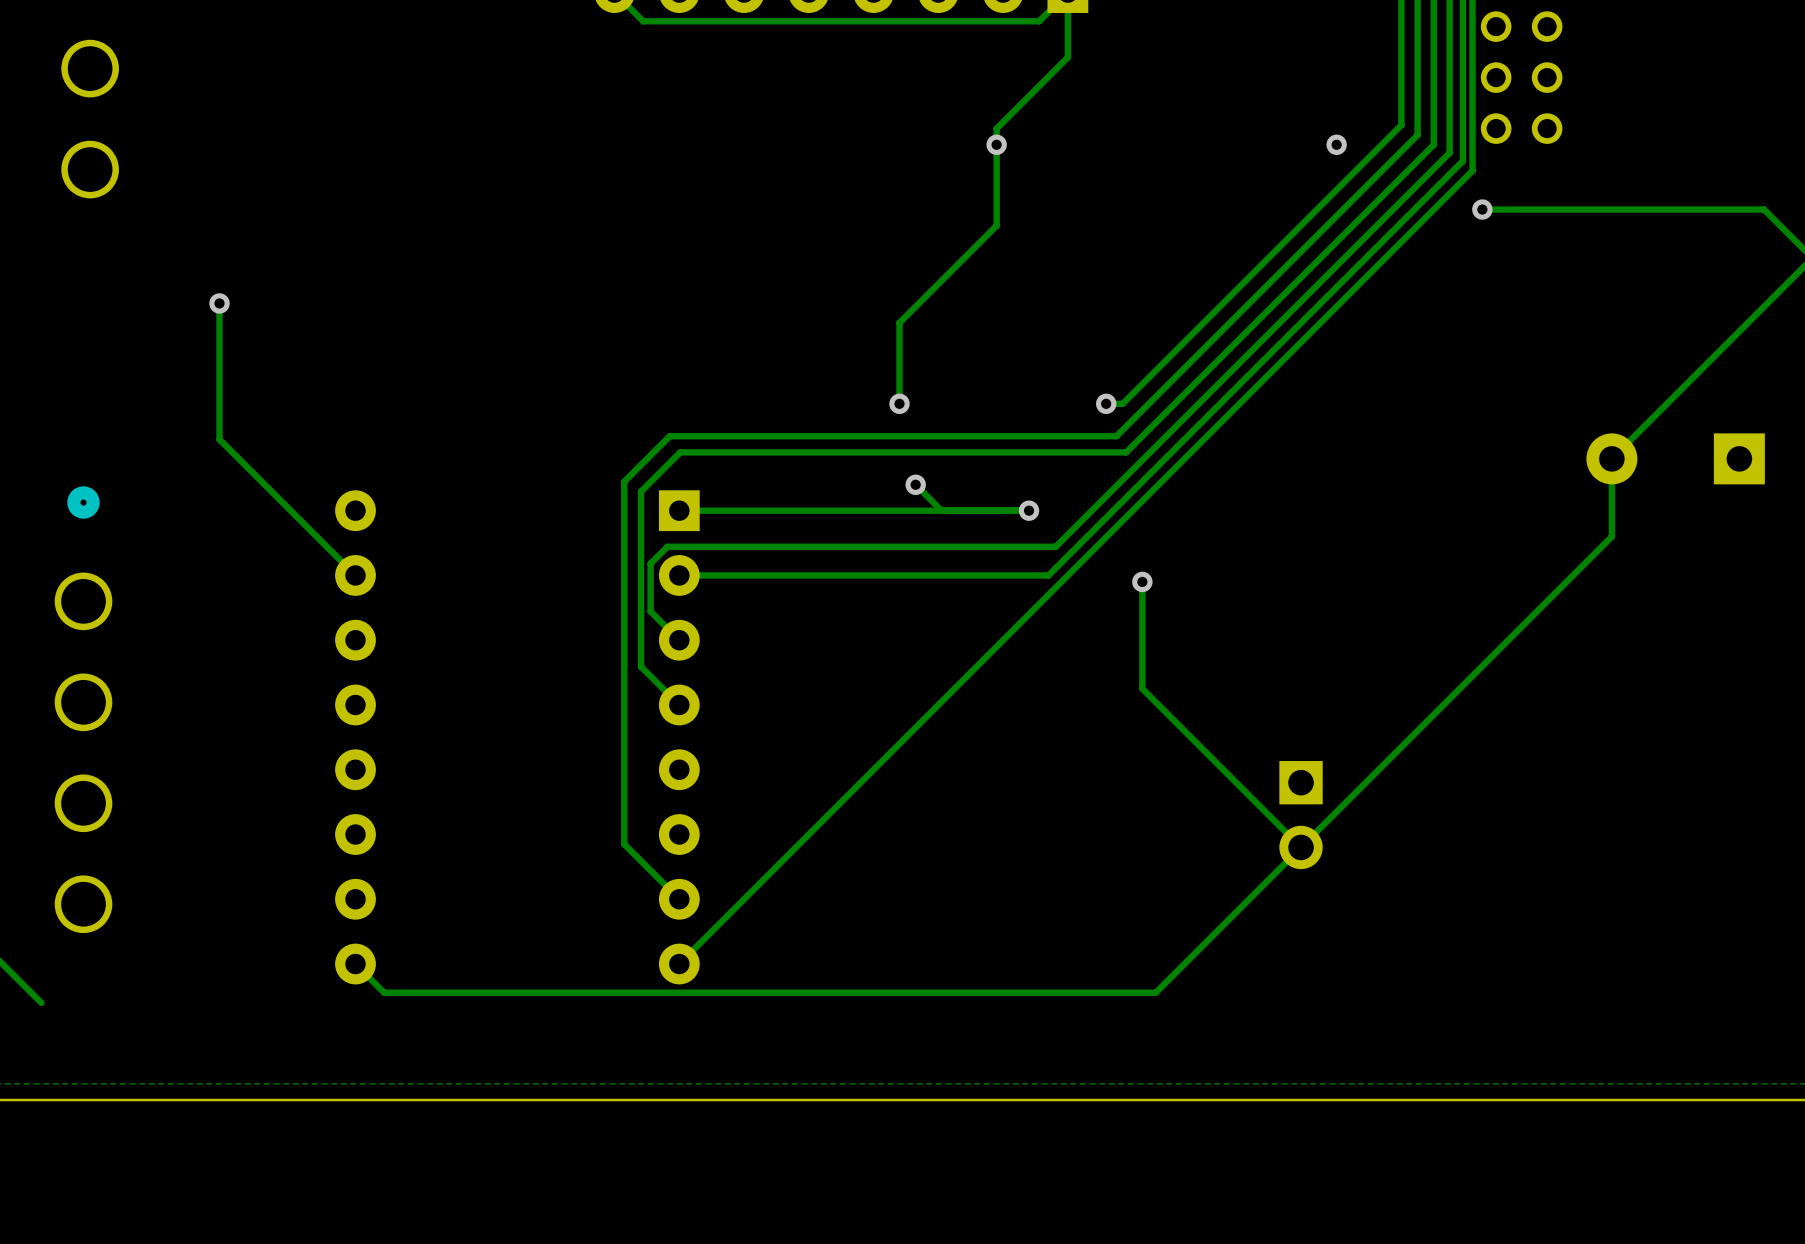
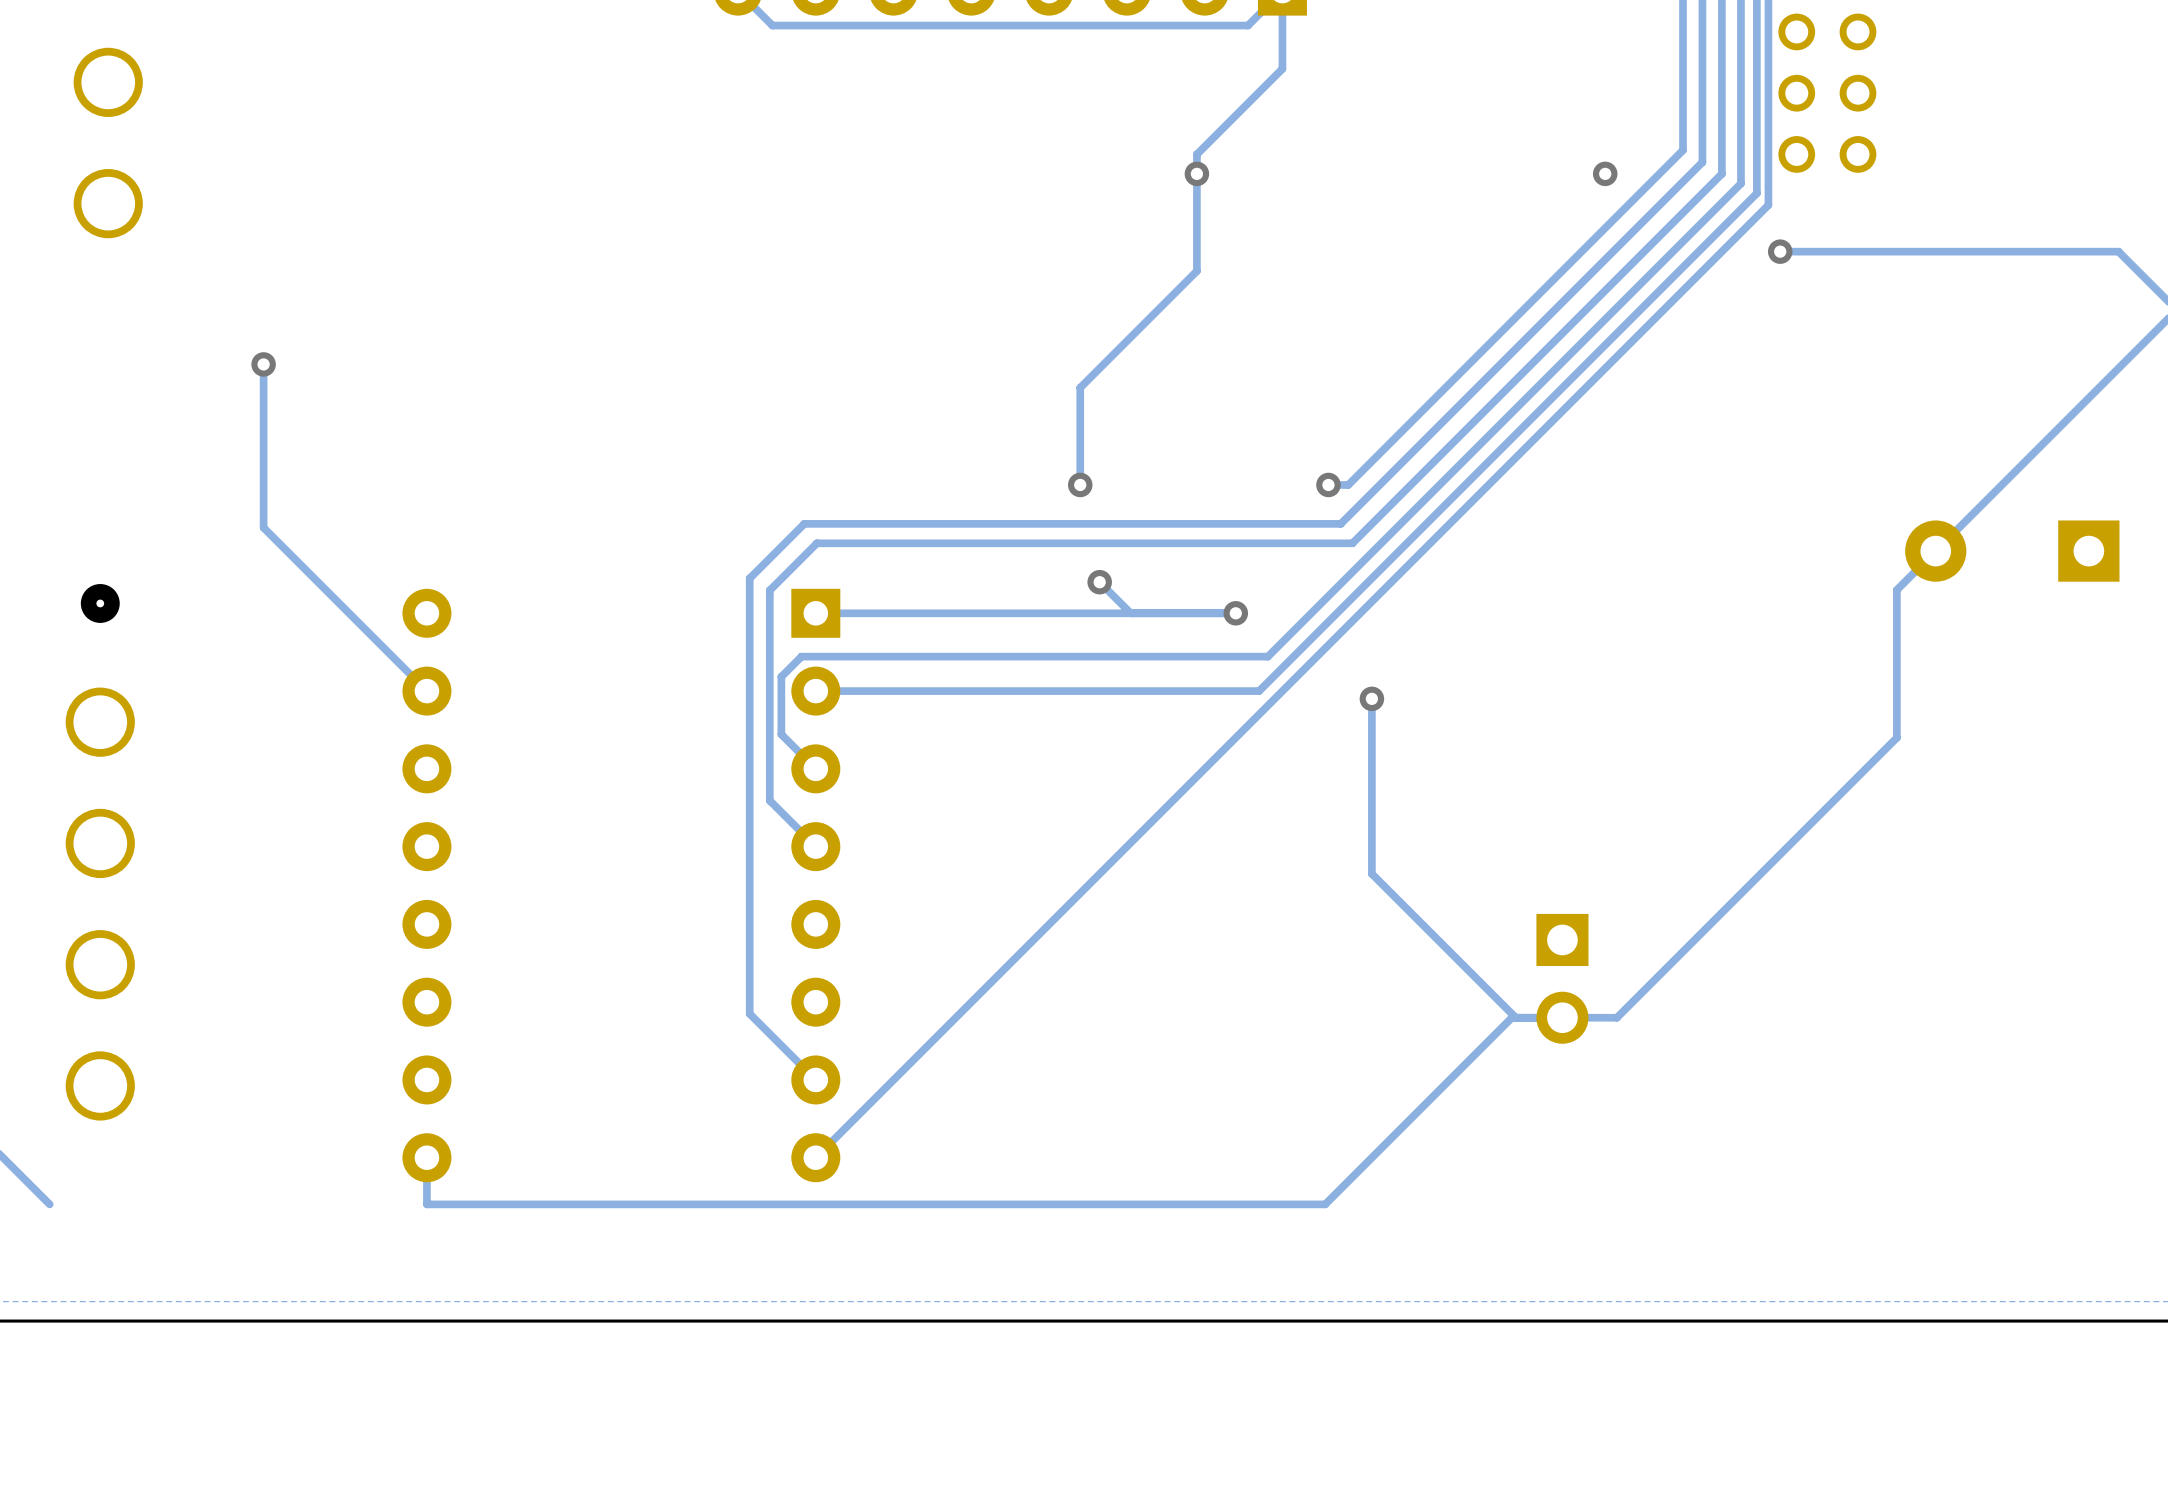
track: (1611, 458) (1611, 536) (1155, 992) (384, 992) (355, 964) -> (1935, 551) (1896, 589) (1896, 737) (1616, 1017) (1511, 1017) (1325, 1204) (426, 1204) (426, 1157)
track: (1142, 688) (1301, 847) -> (1371, 827) (1371, 873) (1515, 1017)

